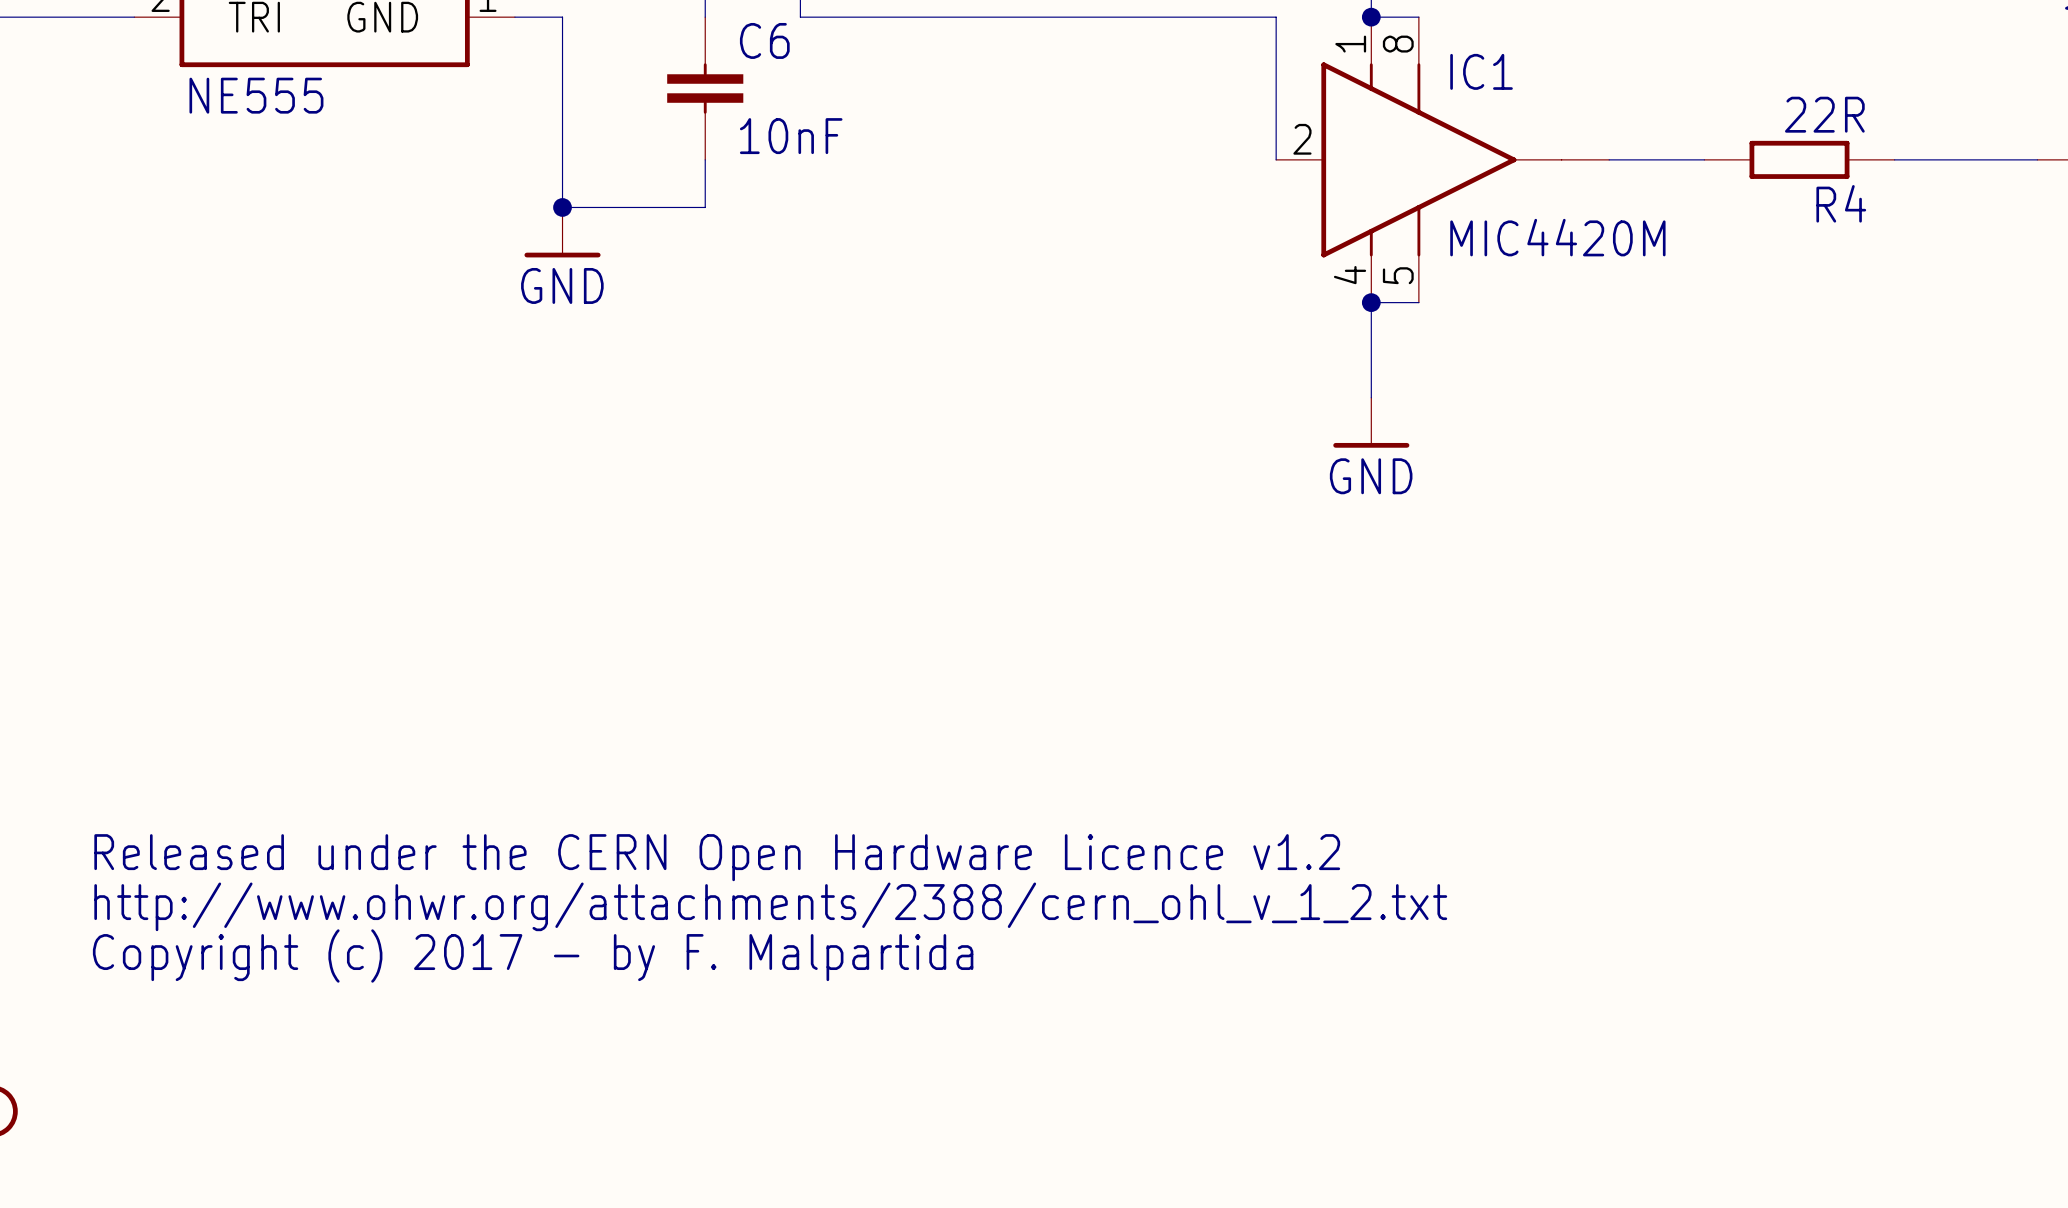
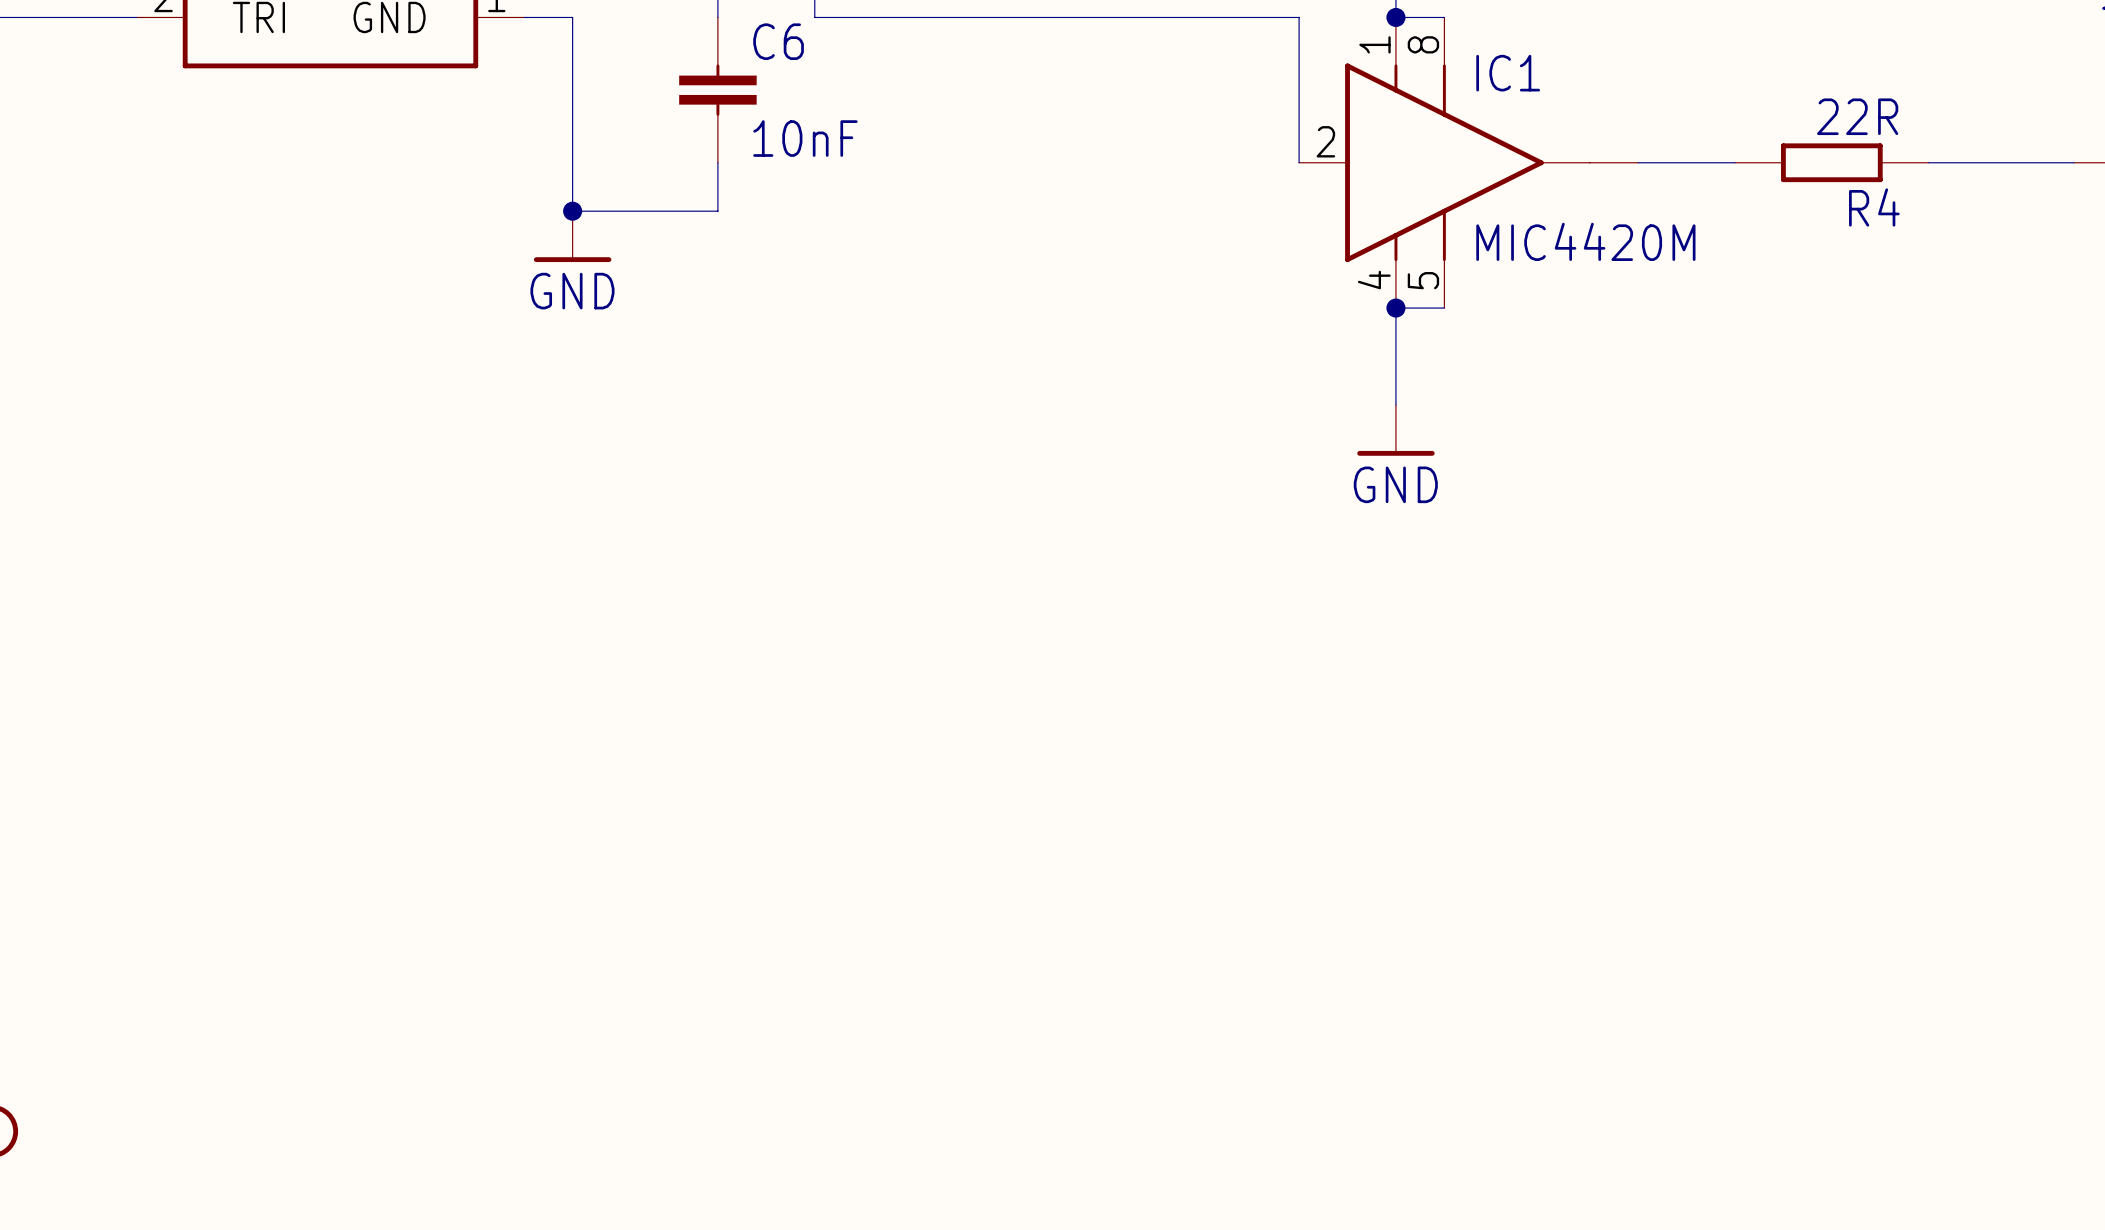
part value: NE555 (256, 95) -> none
text: Released under the CERN Open Hardware Licence v1.2 (717, 857) -> none
text: http://www.ohwr.org/attachments/2388/cern_ohl_v_1_2.txt (770, 906) -> none
text: Copyright (c) 2017 - by F. Malpartida (533, 955) -> none

